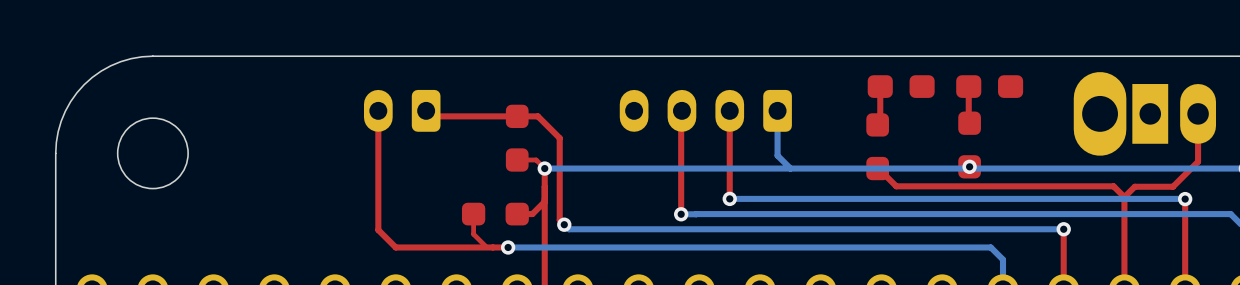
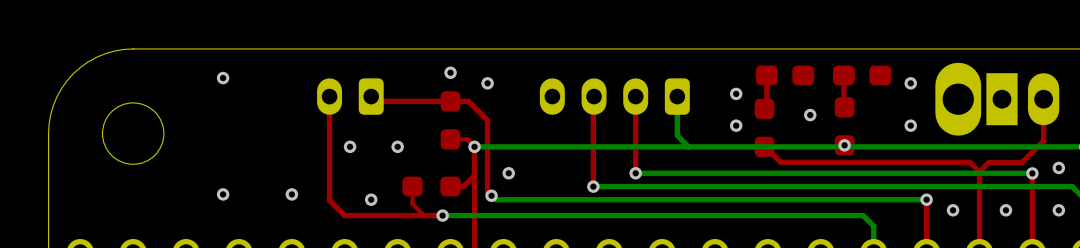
via: none -> (450, 72)
via: none -> (223, 78)
via: none -> (487, 83)
via: none -> (910, 83)
via: none -> (736, 93)
via: none -> (810, 115)
via: none -> (736, 125)
via: none -> (910, 125)
via: none -> (350, 146)
via: none -> (397, 146)
via: none -> (1058, 167)
via: none -> (508, 173)
via: none -> (223, 194)
via: none -> (291, 194)
via: none -> (371, 199)
via: none -> (953, 210)
via: none -> (1005, 210)
via: none -> (1058, 210)

